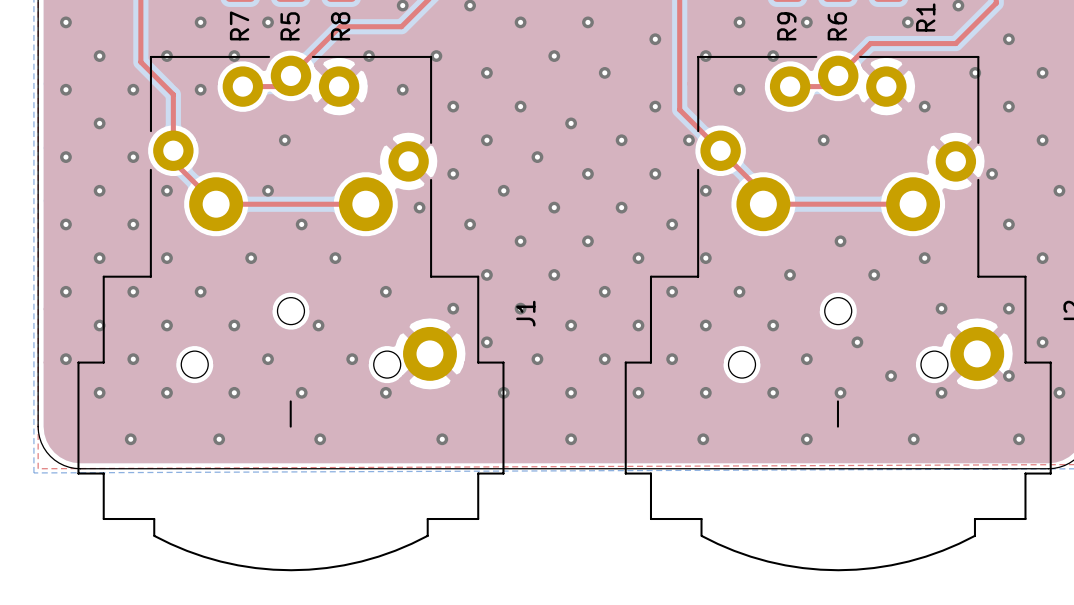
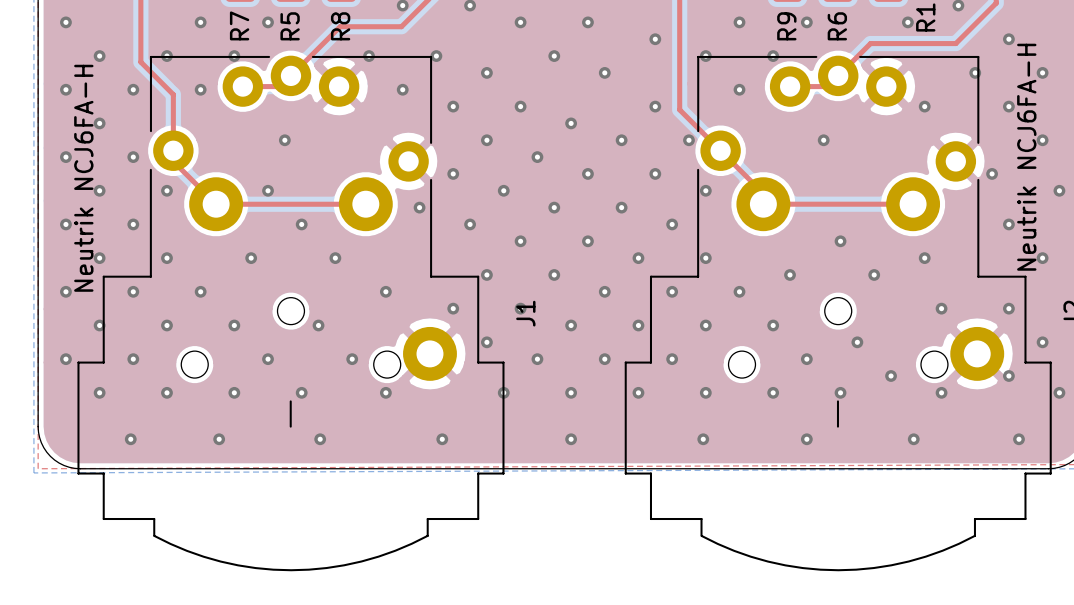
text: none -> Neutrik NCJ6FA-H (1026, 157)
text: none -> Neutrik NCJ6FA-H (83, 178)

